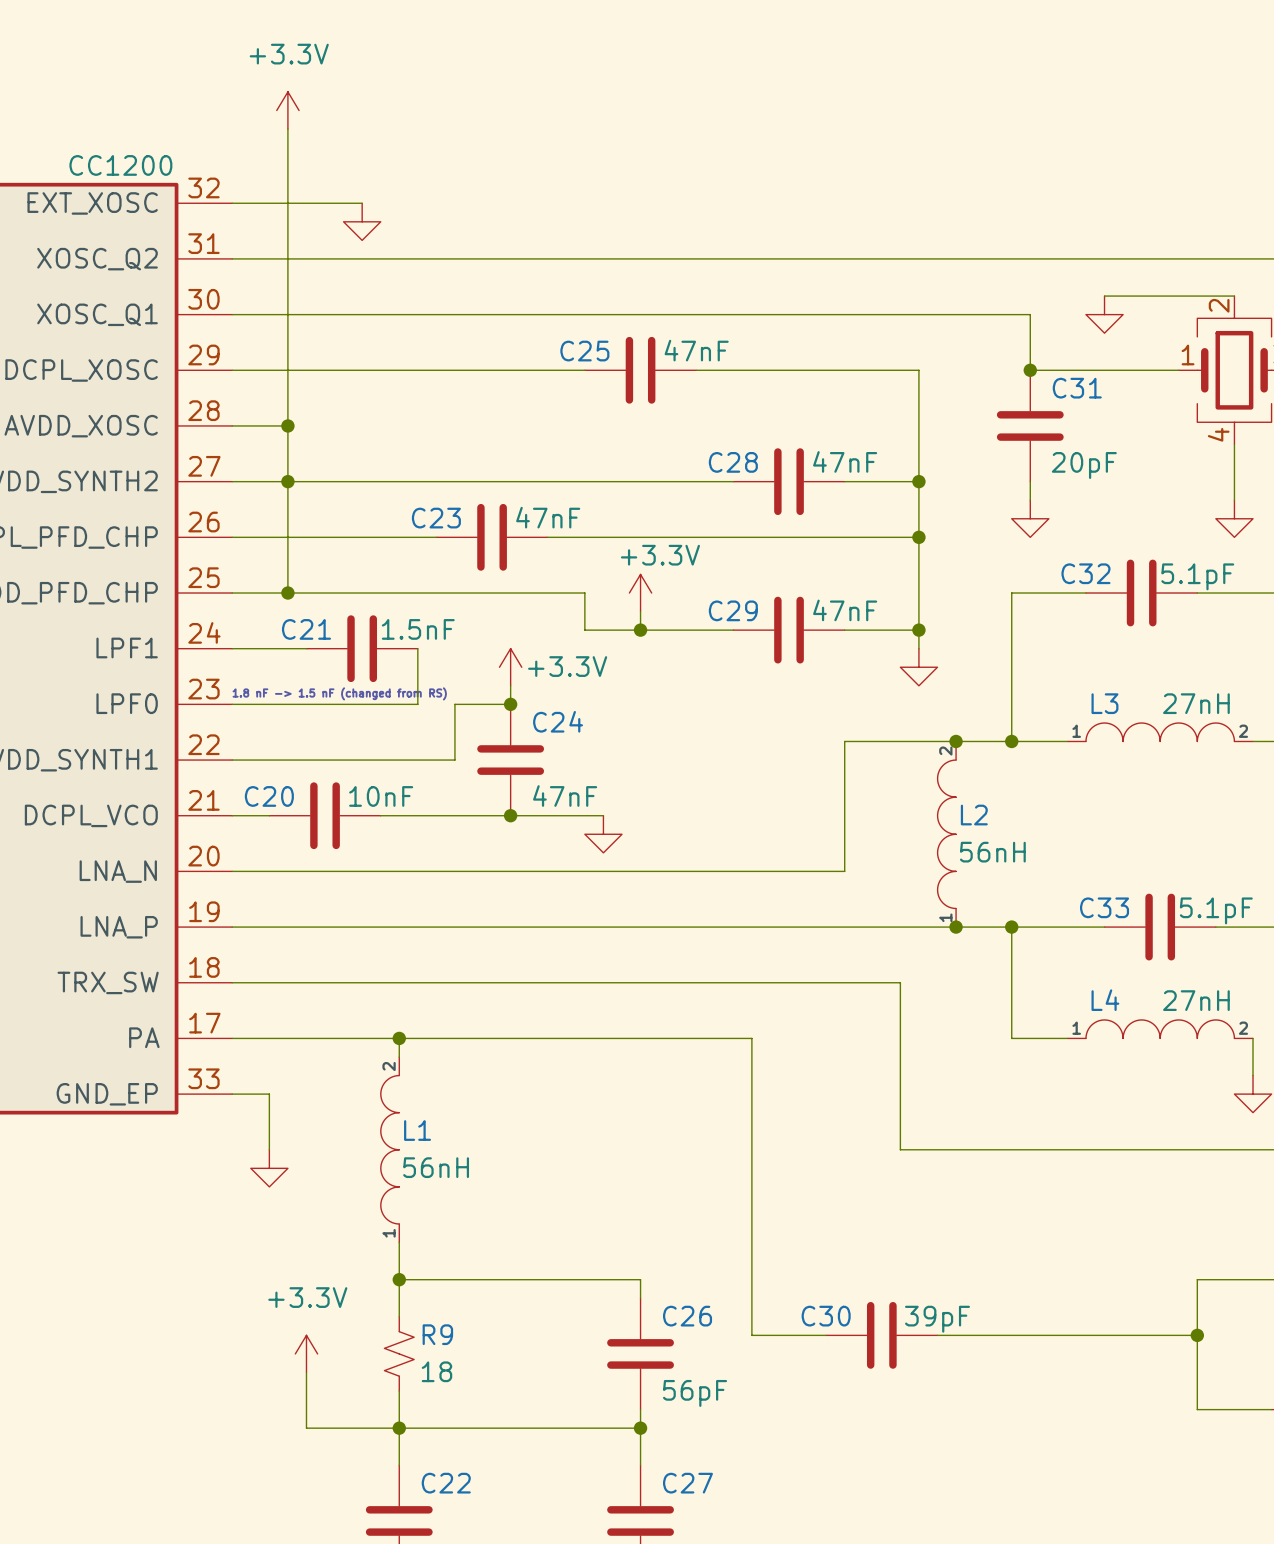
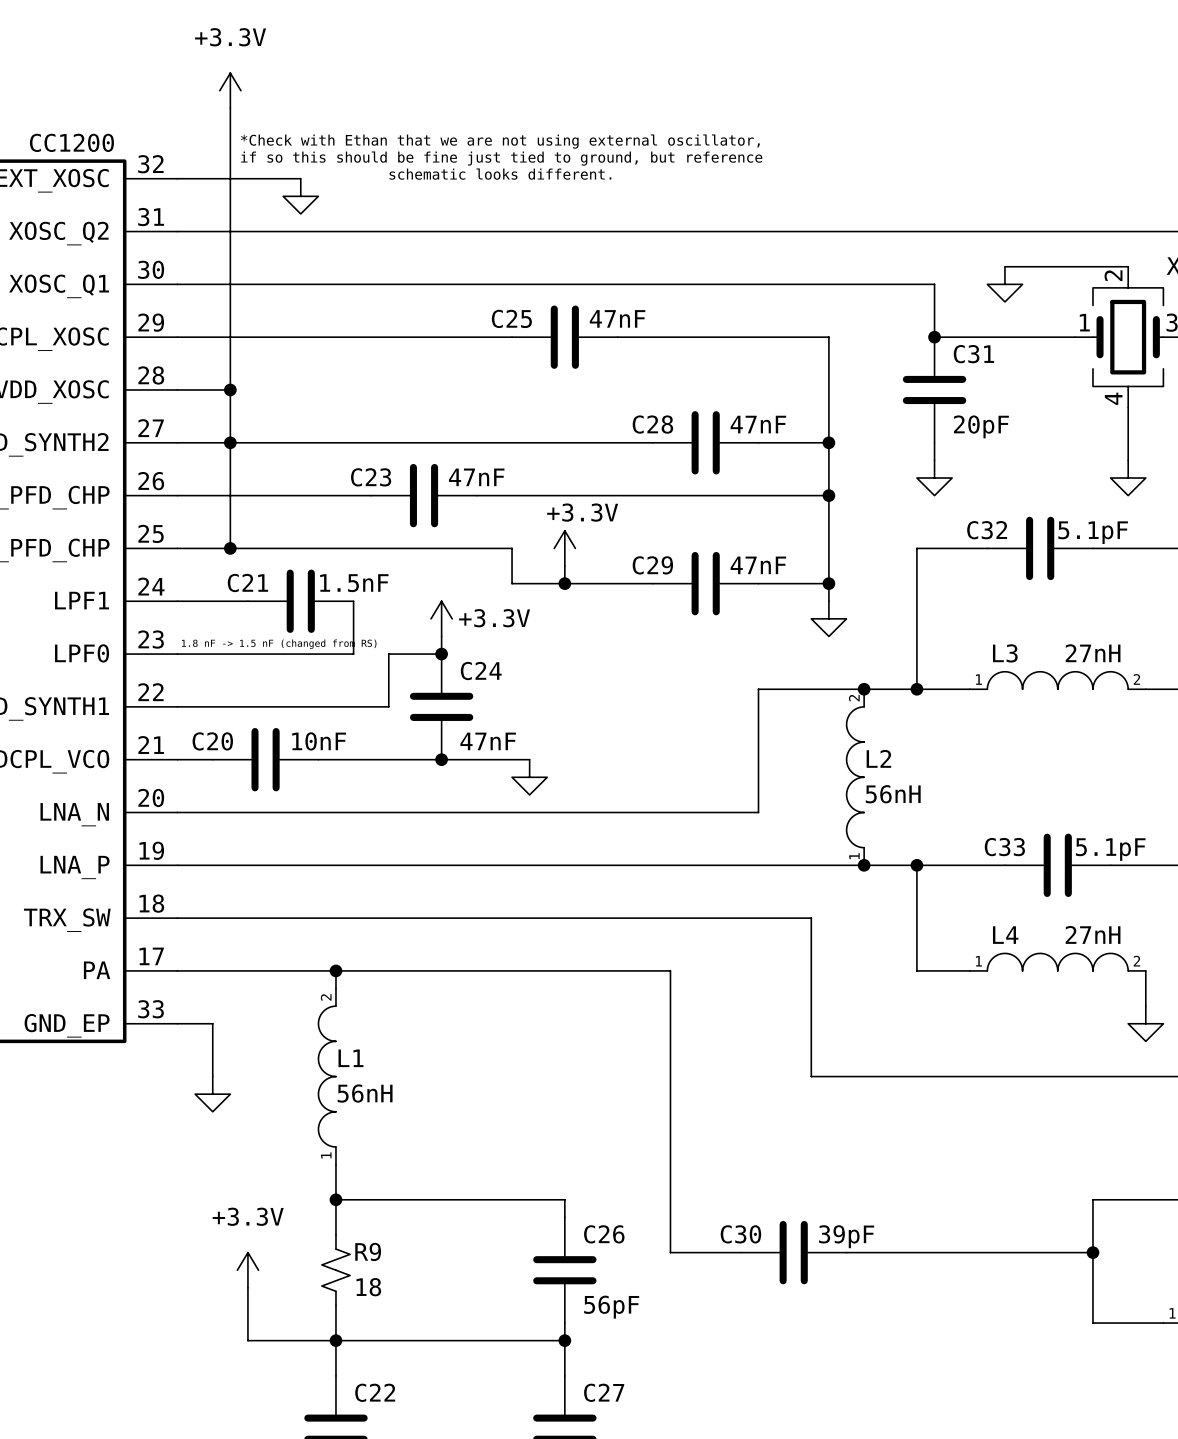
text: none -> *Check with Ethan that we are not using external oscillator, (500, 141)
text: none -> if so this should be fine just tied to ground, but reference (501, 158)
text: none -> schematic looks different. (500, 174)

